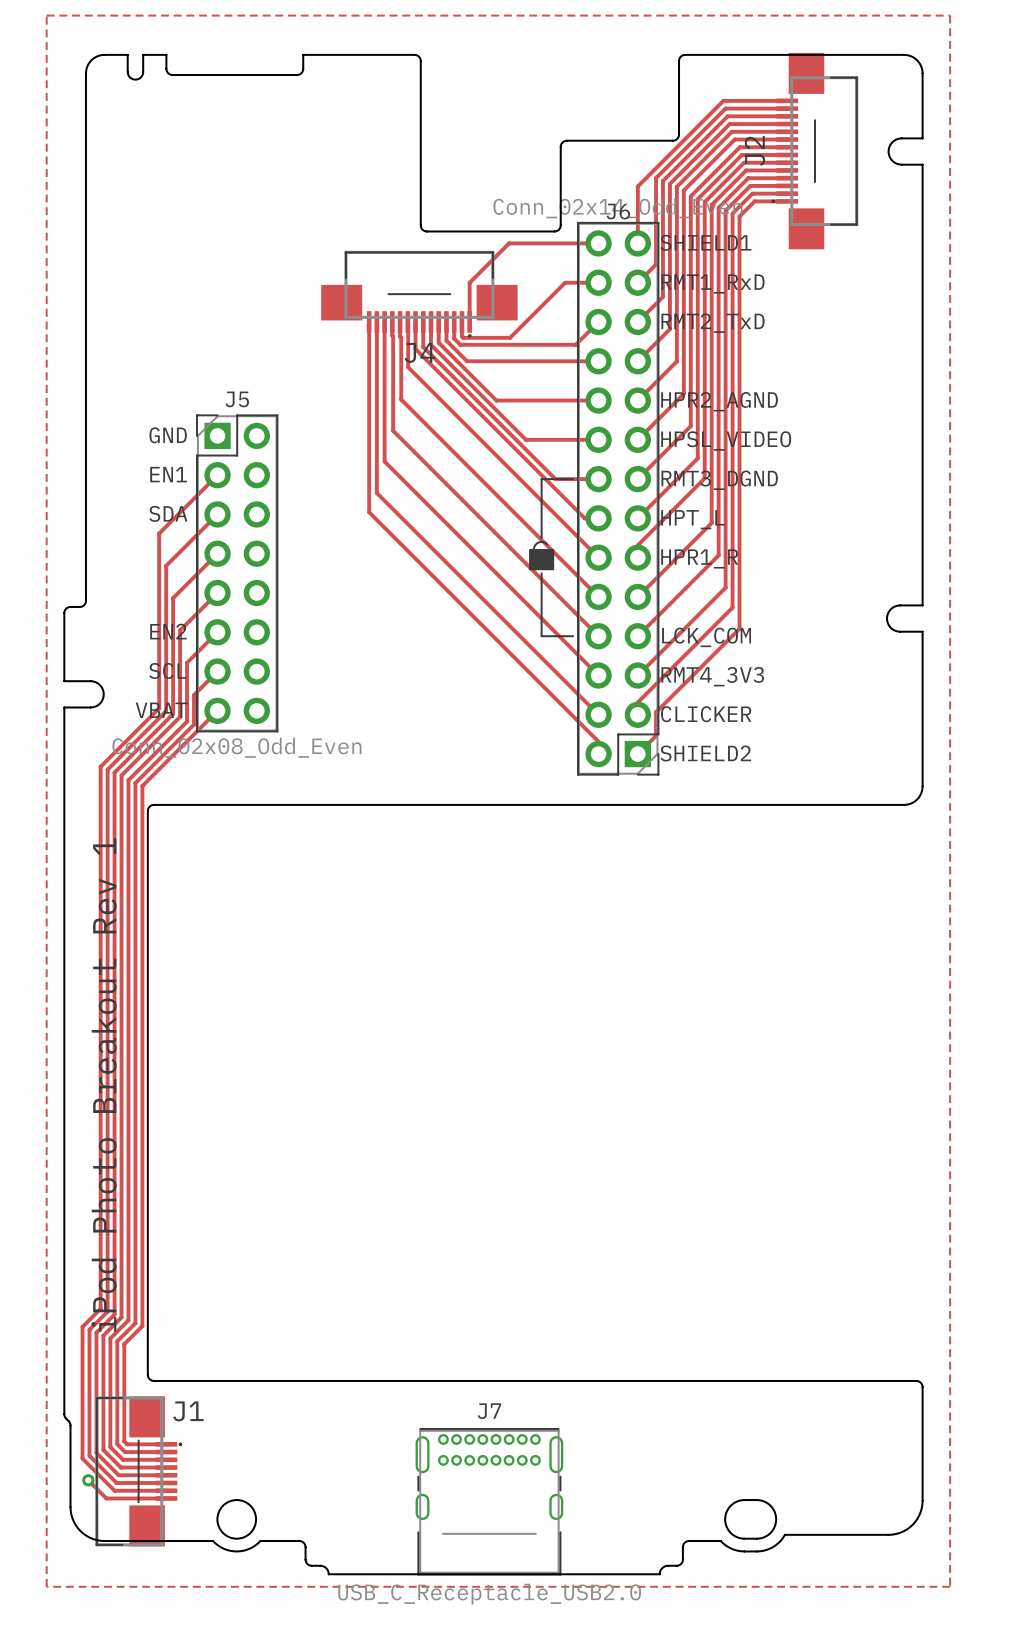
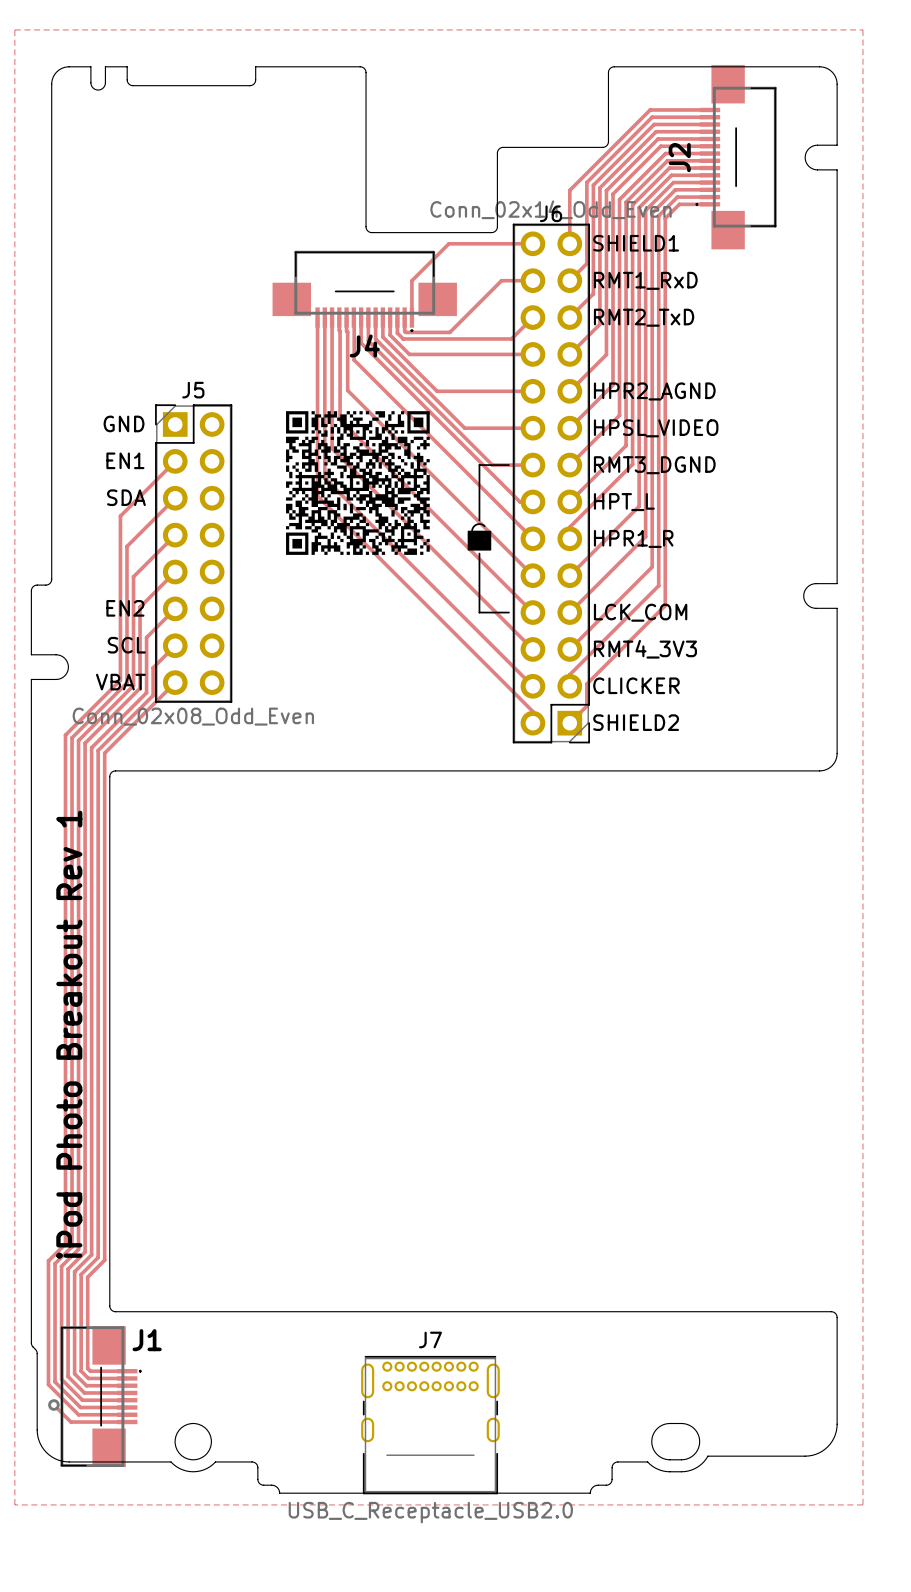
drawing: none -> [286, 411, 430, 555]

